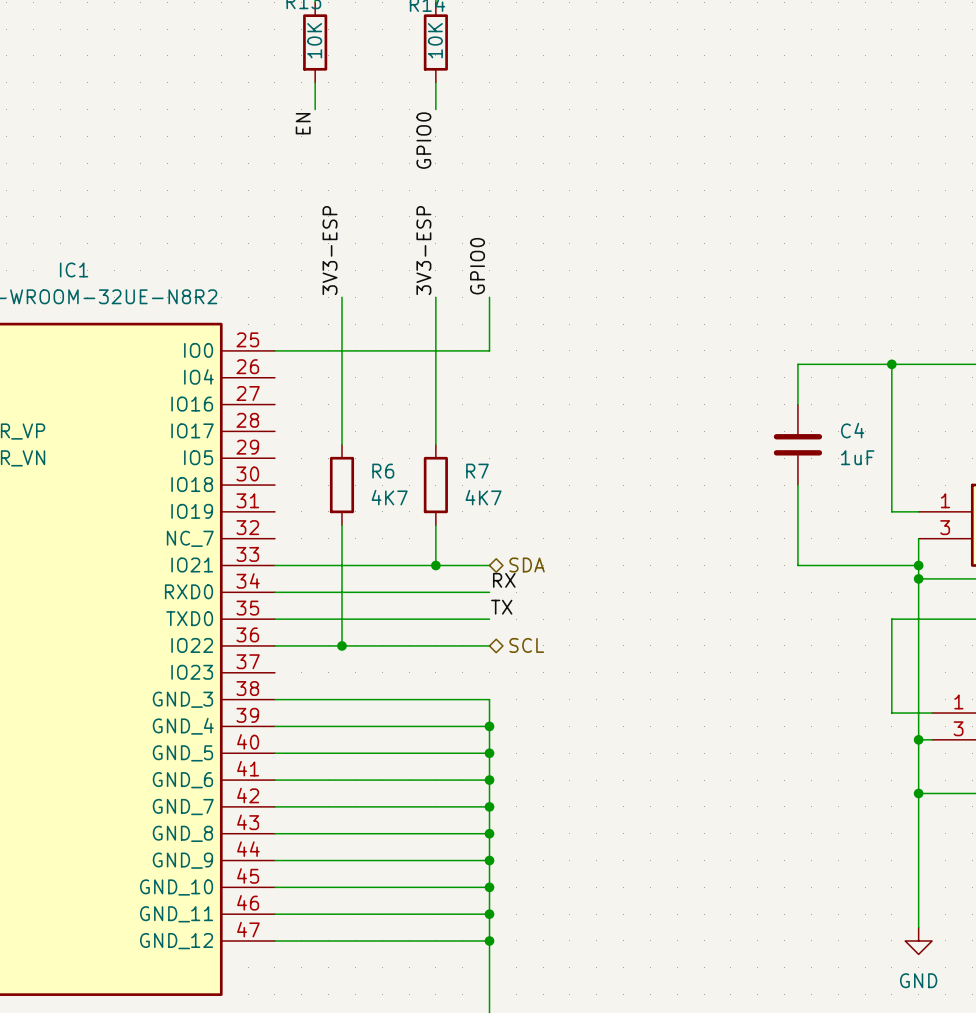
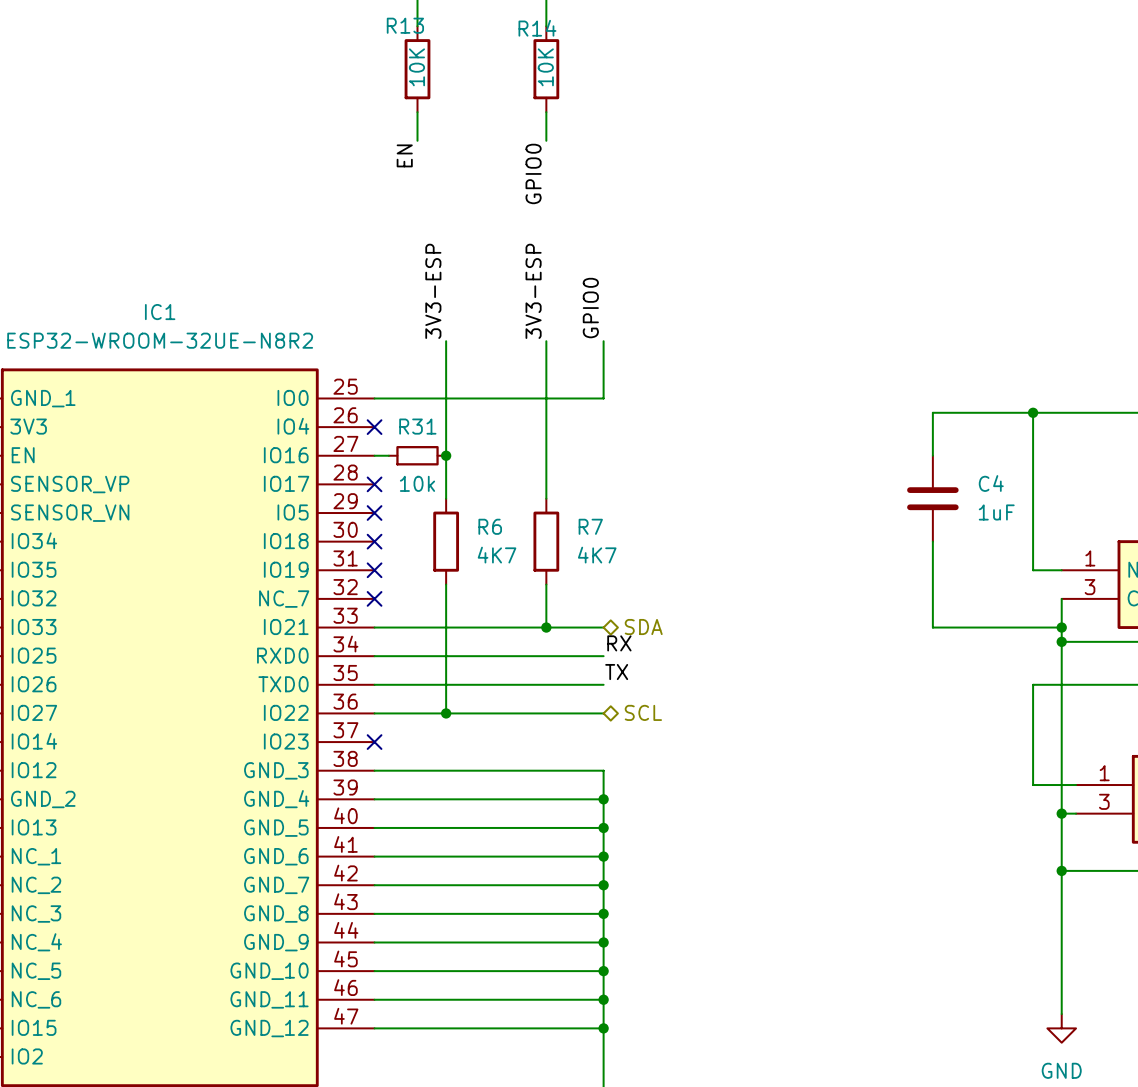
no-connect mark: none -> (374, 427)
wire: none -> (374, 455) (388, 455)
R31: none -> 10k (417, 455)
junction: none -> (446, 455)
no-connect mark: none -> (374, 484)
no-connect mark: none -> (374, 513)
no-connect mark: none -> (374, 541)
no-connect mark: none -> (374, 570)
no-connect mark: none -> (374, 598)
no-connect mark: none -> (374, 742)

